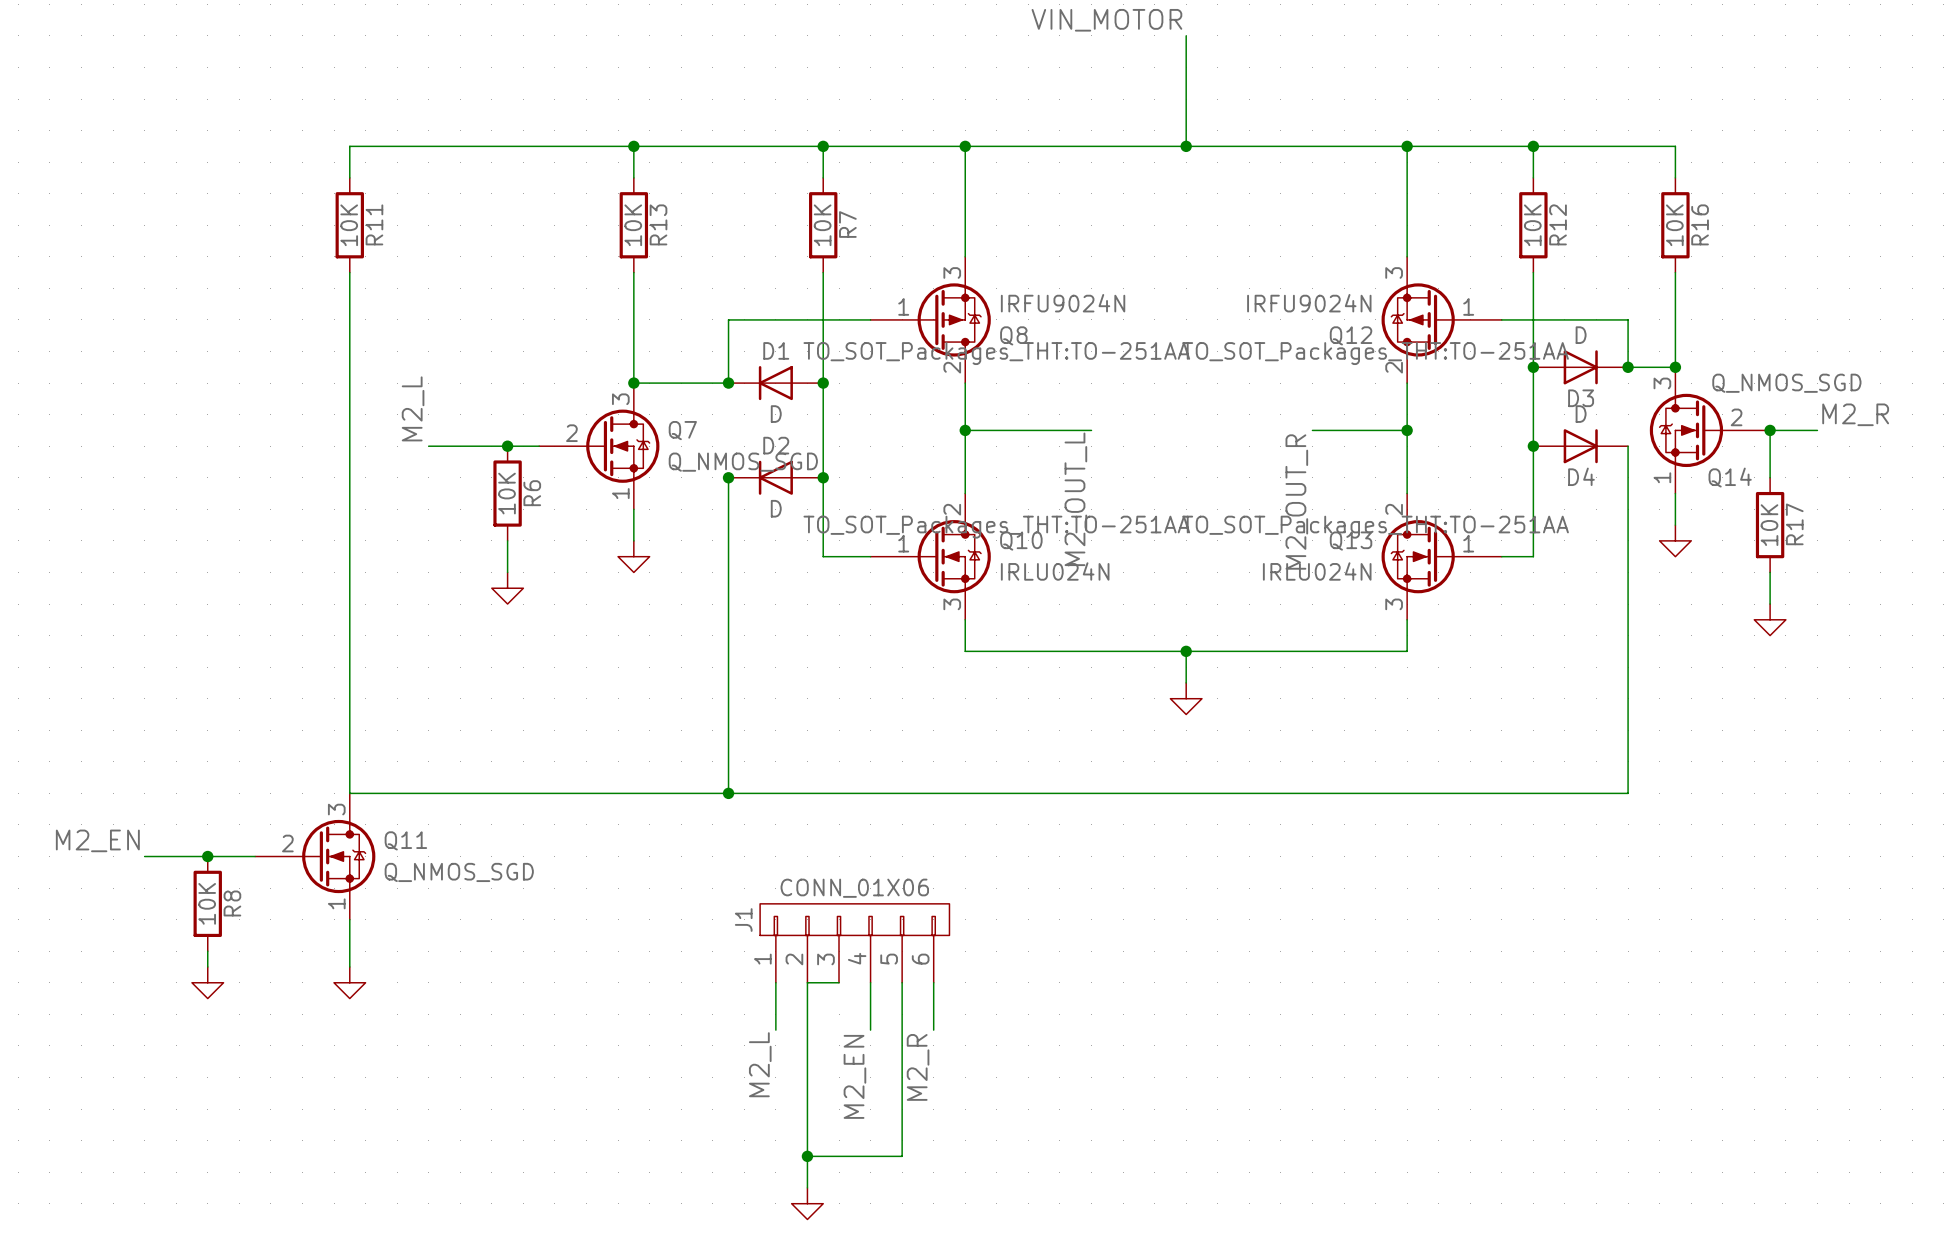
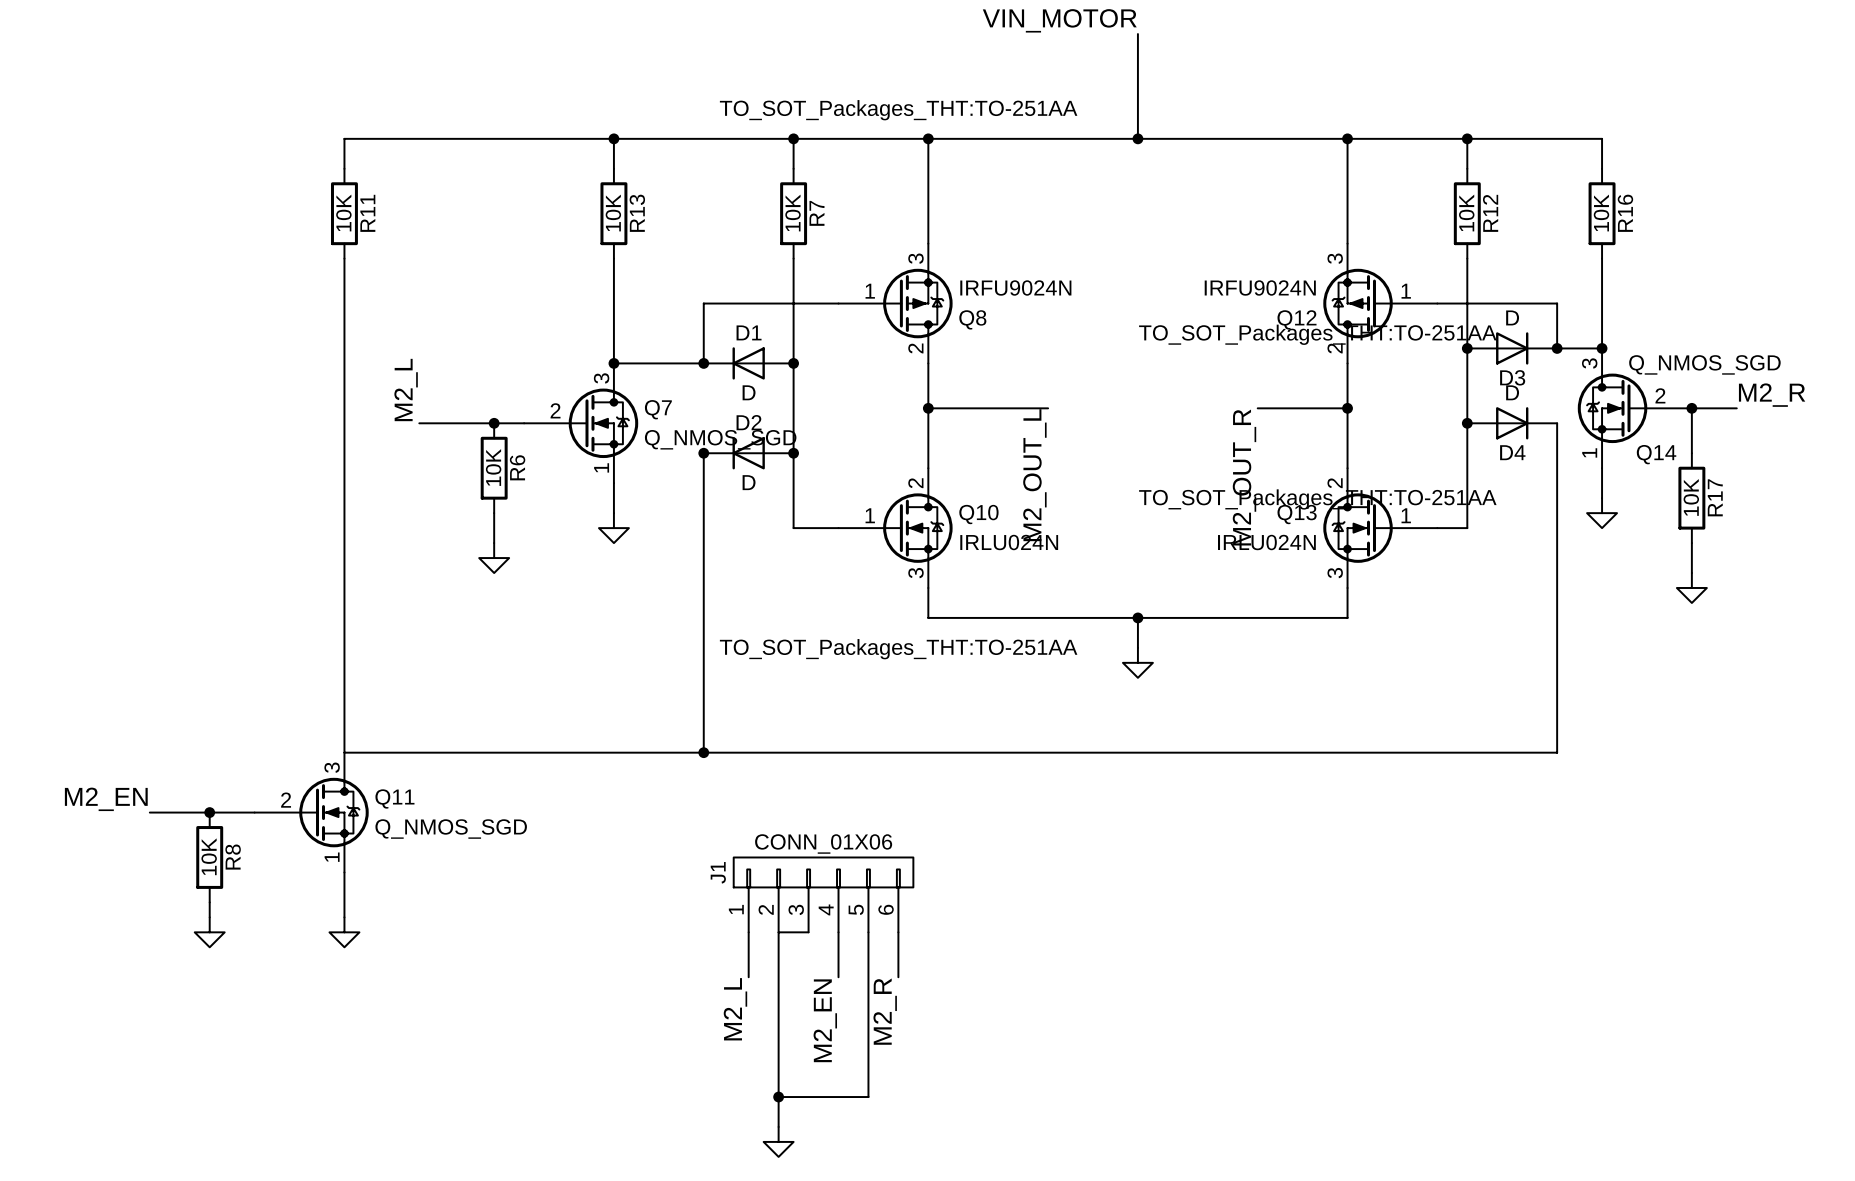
Q8 text position: TO_SOT_Packages_THT:TO-251AA (996, 353) -> TO_SOT_Packages_THT:TO-251AA (898, 110)
Q10 text position: TO_SOT_Packages_THT:TO-251AA (996, 527) -> TO_SOT_Packages_THT:TO-251AA (898, 649)

